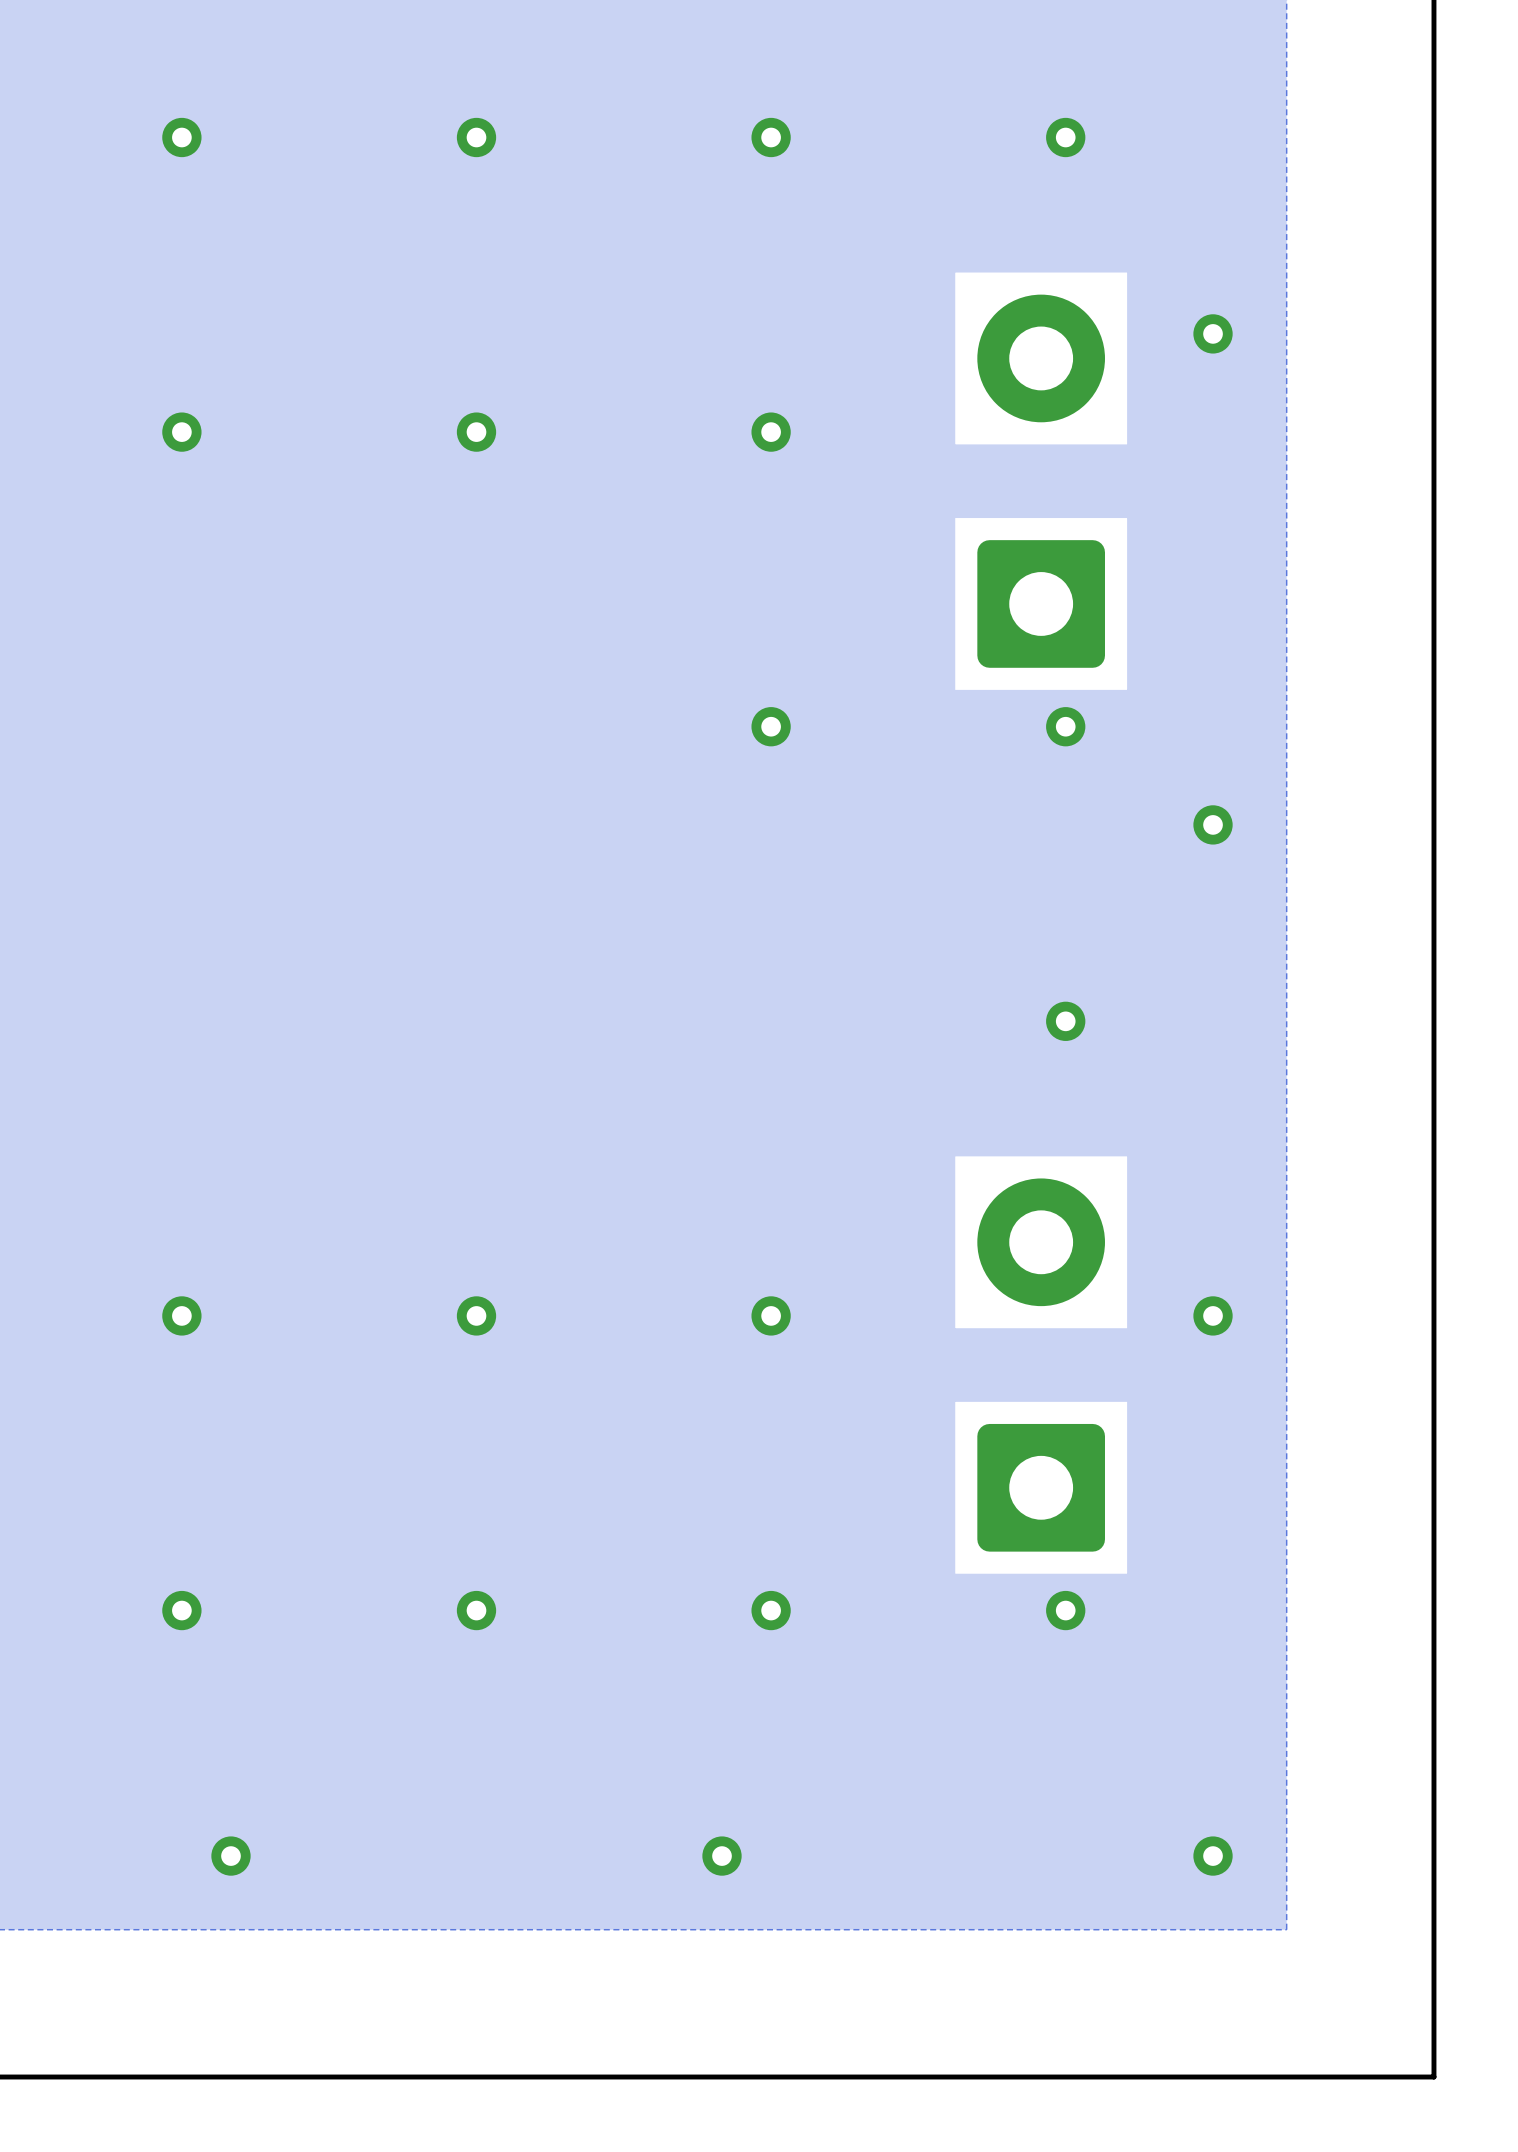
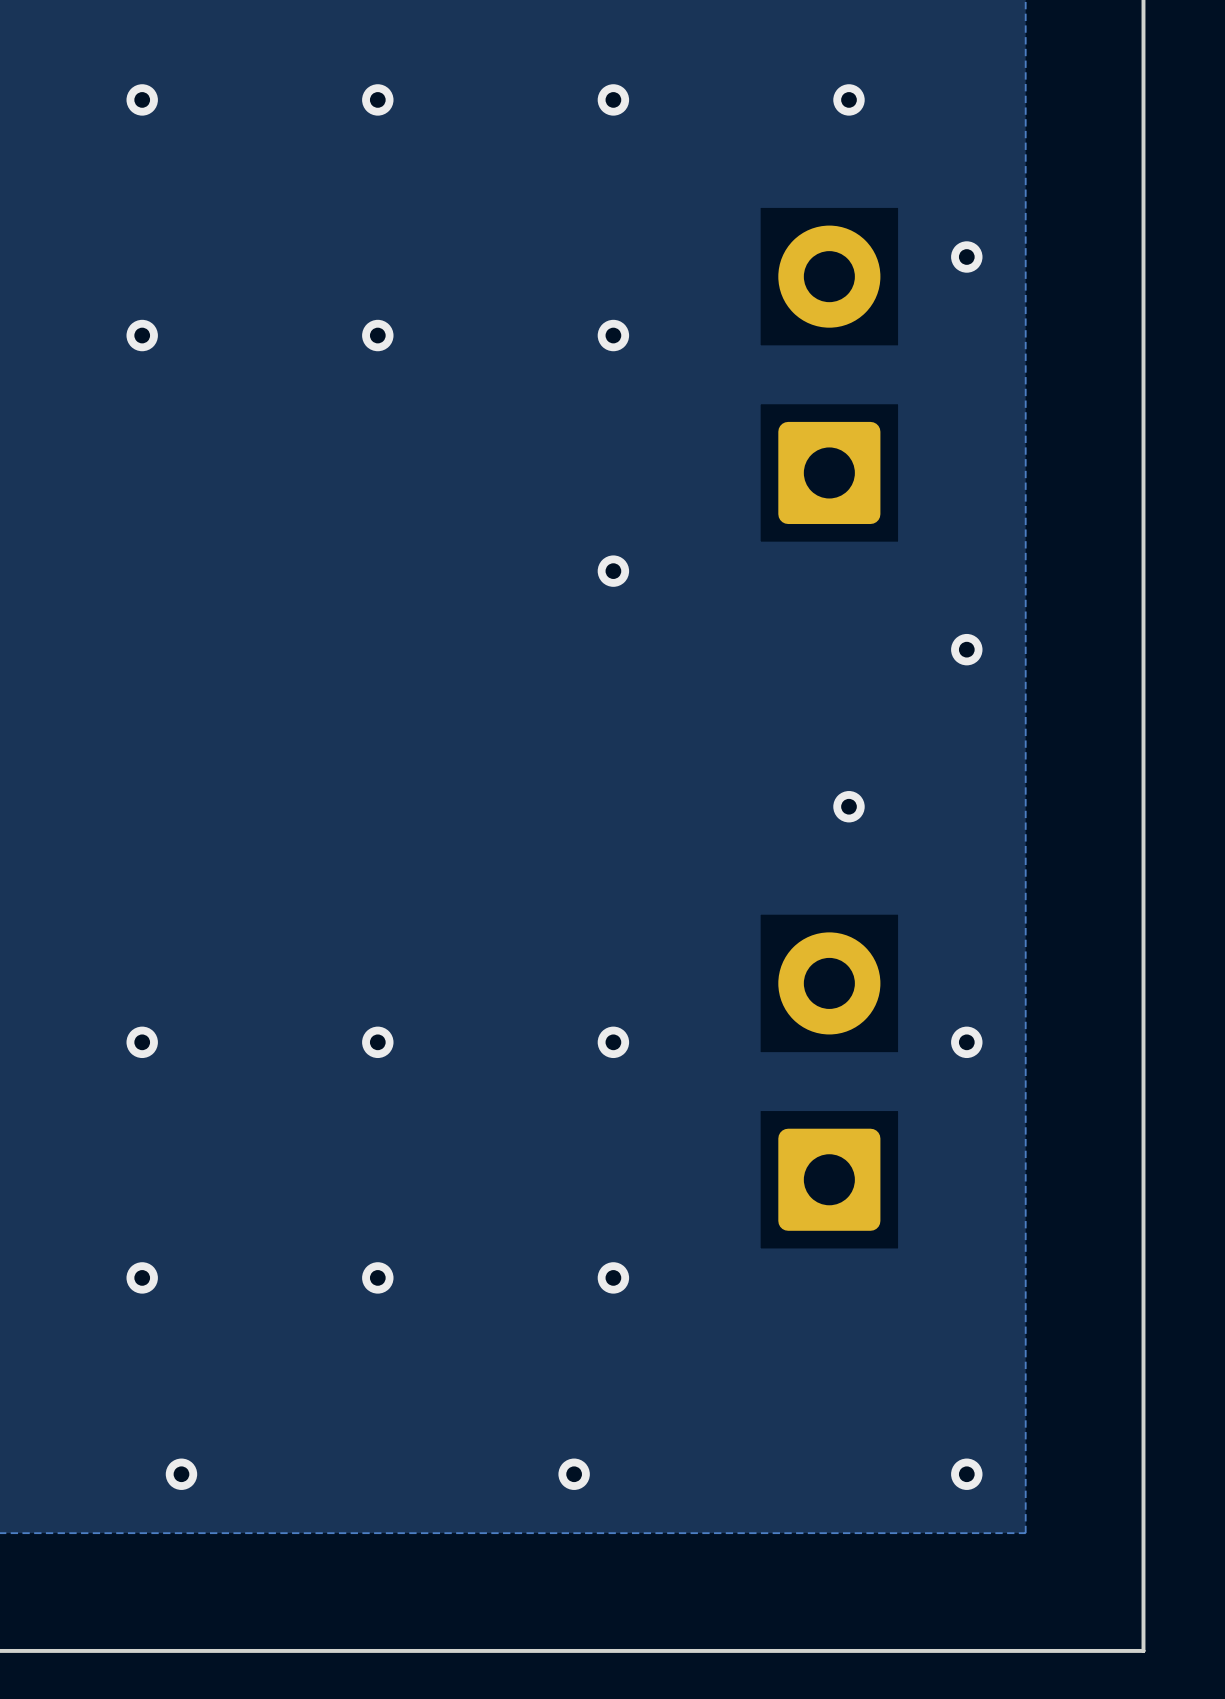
via: (1065, 726) -> none
via: (1065, 1610) -> none

